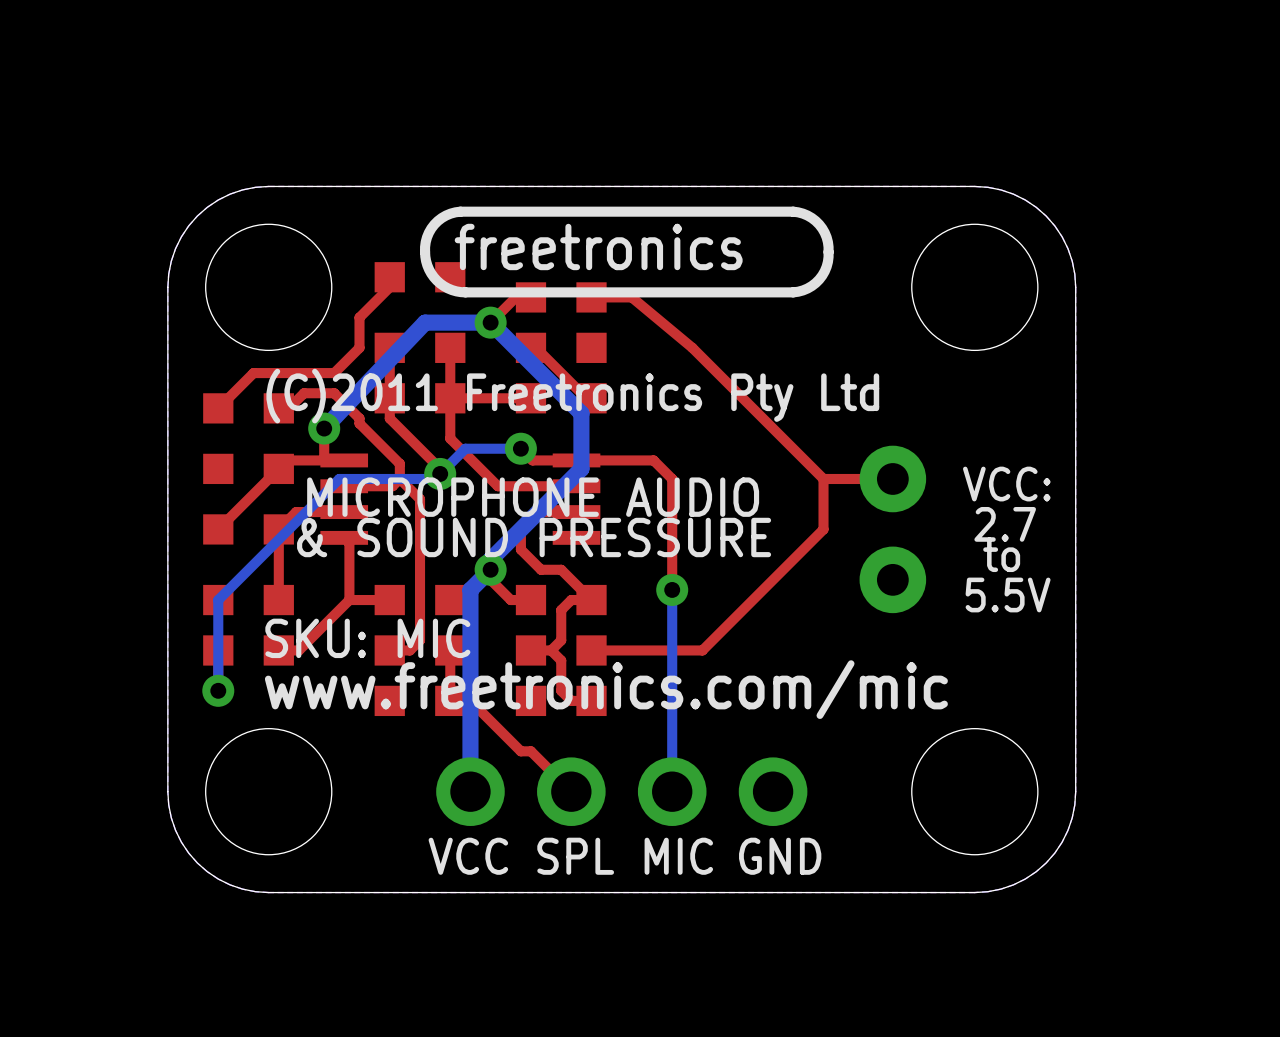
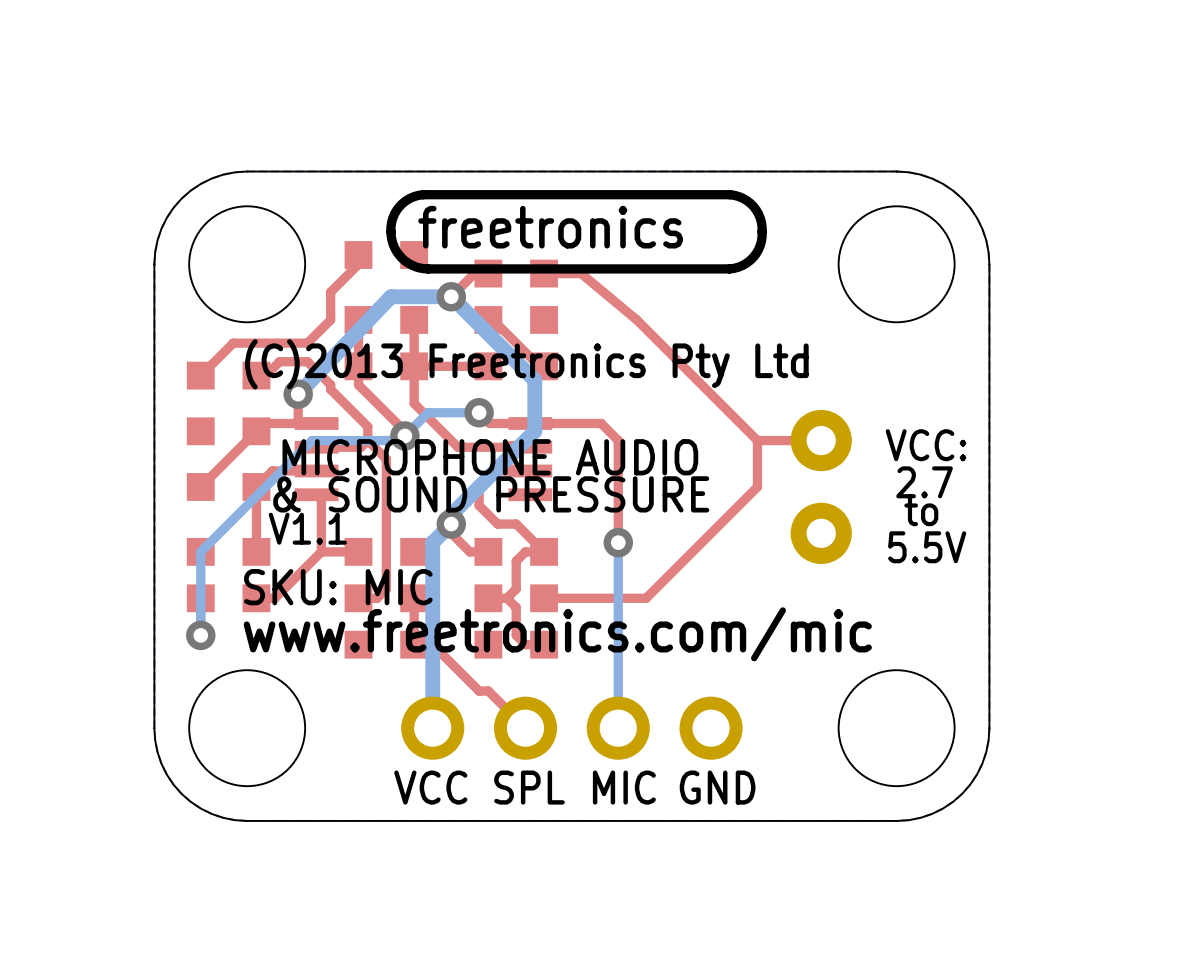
text: (C)2011 Freetronics Pty Ltd (572, 396) -> (C)2013 Freetronics Pty Ltd (526, 364)
text: none -> V1.1 (307, 528)

